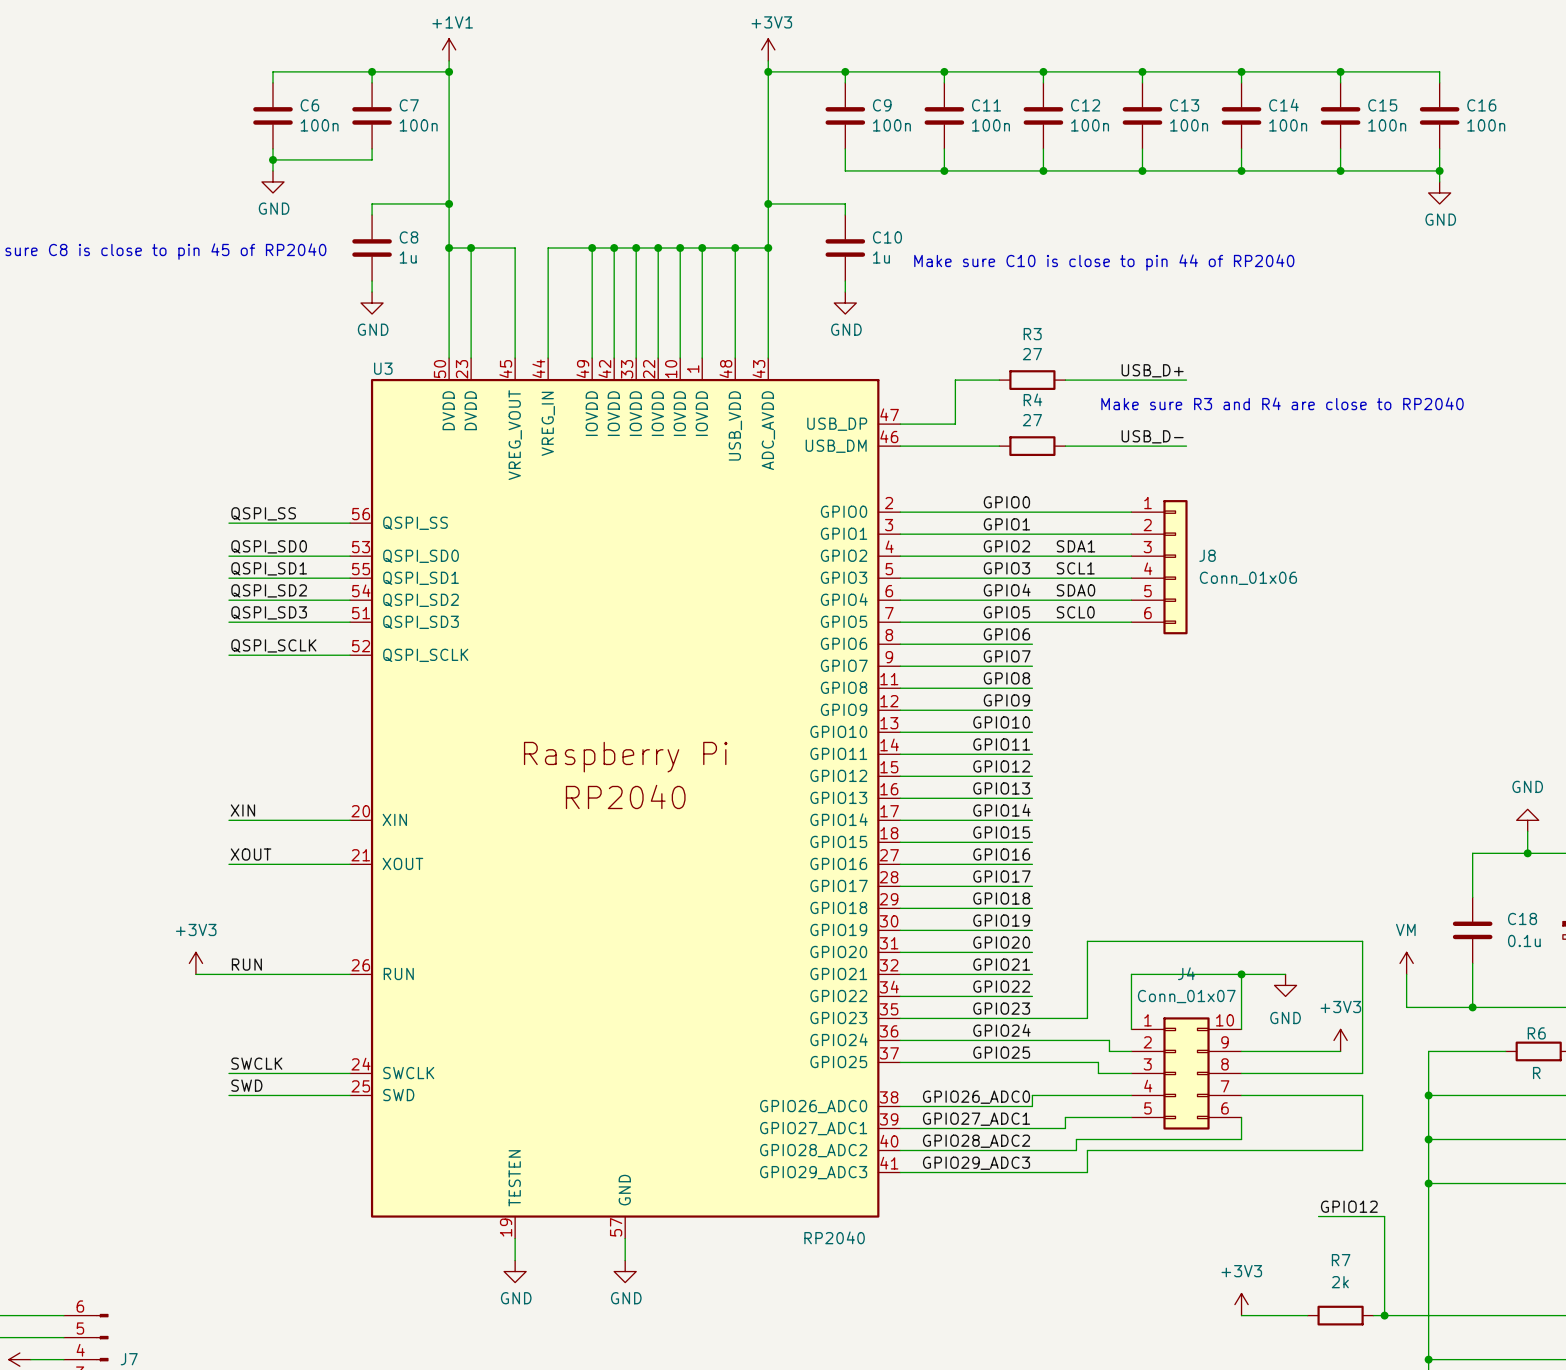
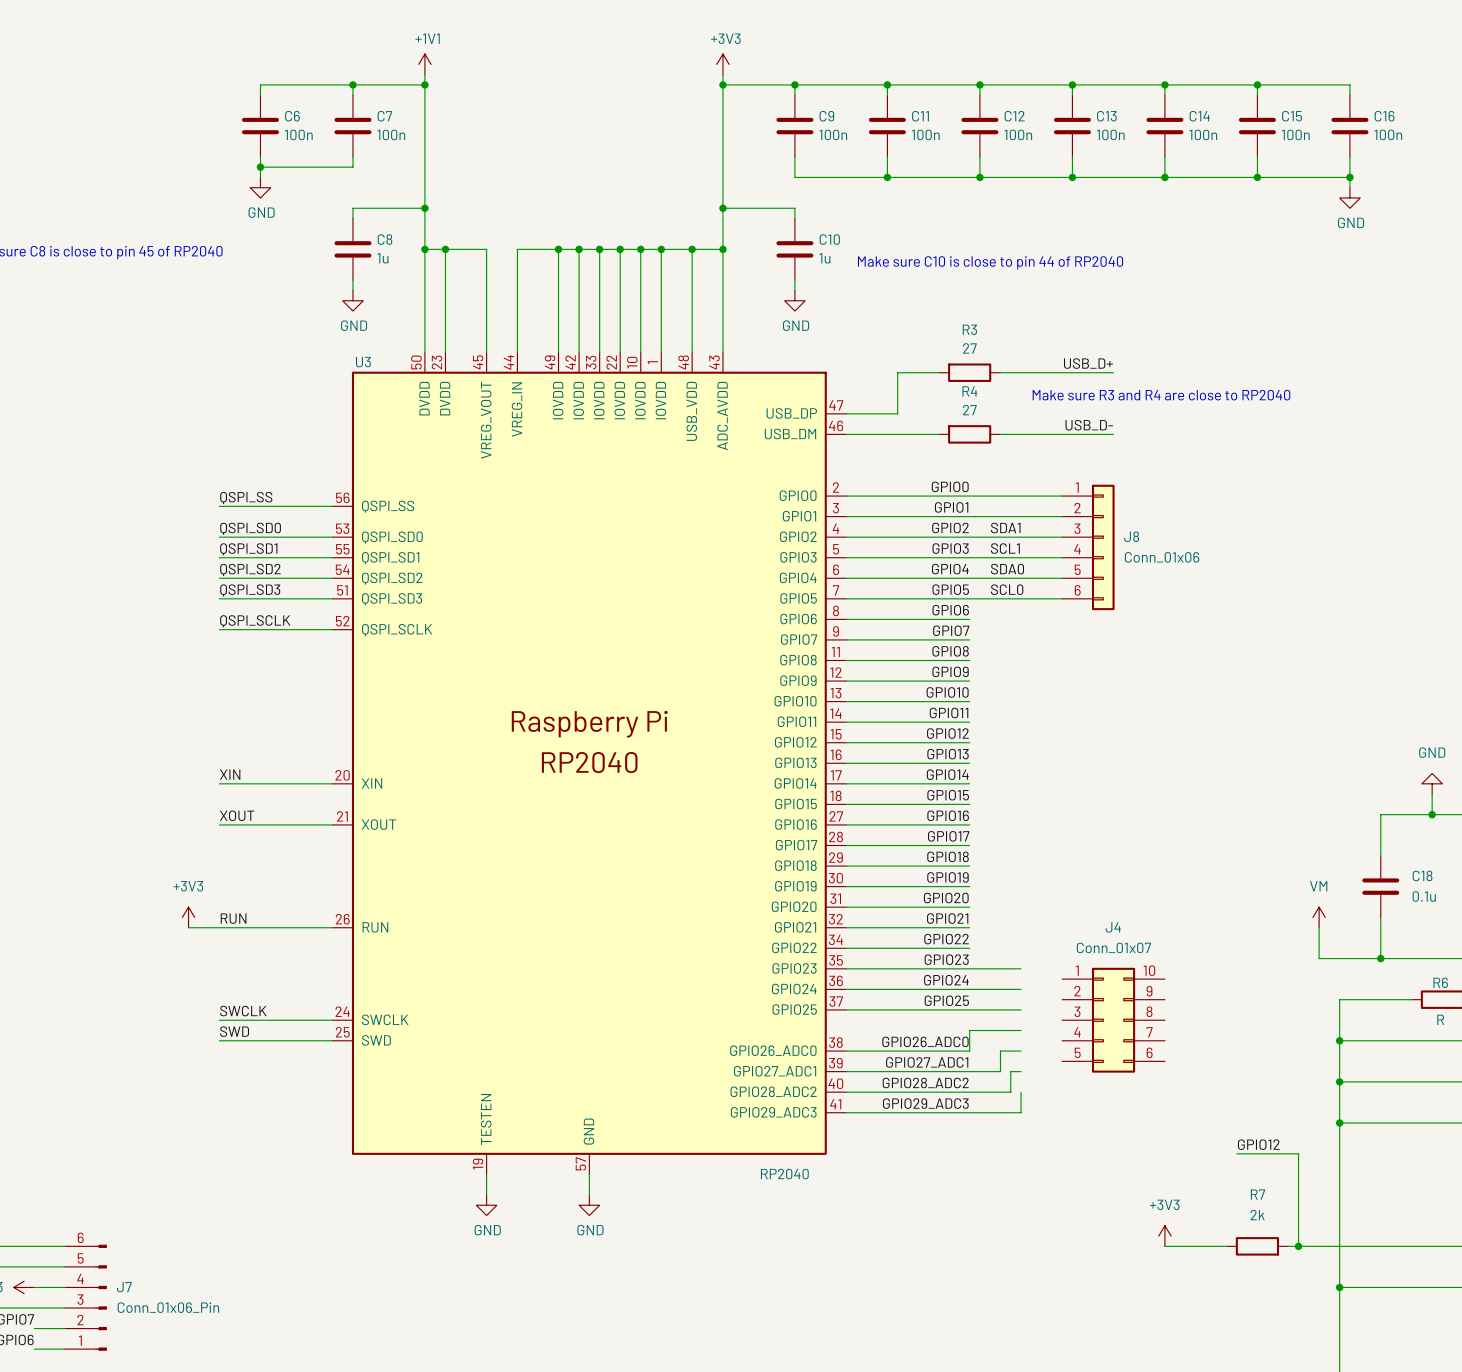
wire: (1241, 974) (1241, 1029) -> none
junction: (1241, 974) -> none
wire: (1285, 974) (1131, 974) (1131, 1029) -> none
power symbol: GND (1285, 985) -> none
wire: (1087, 1018) (1087, 941) (1362, 941) (1362, 1073) (1241, 1073) -> none
wire: (1087, 1040) (1109, 1040) (1109, 1051) (1131, 1051) -> none
power symbol: +3V3 (1340, 1040) -> none
wire: (1241, 1051) (1340, 1051) -> none
wire: (1087, 1062) (1098, 1062) (1098, 1073) (1131, 1073) -> none
wire: (1032, 1095) (1131, 1095) -> (969, 1040) (969, 1030) (1021, 1030)
wire: (1241, 1095) (1362, 1095) (1362, 1150) (1087, 1150) -> none
wire: (1065, 1117) (1131, 1117) -> (1000, 1061) (1000, 1051) (1021, 1051)
wire: (1241, 1117) (1241, 1139) (1076, 1139) -> (1021, 1071) (1010, 1071) (1010, 1081)

